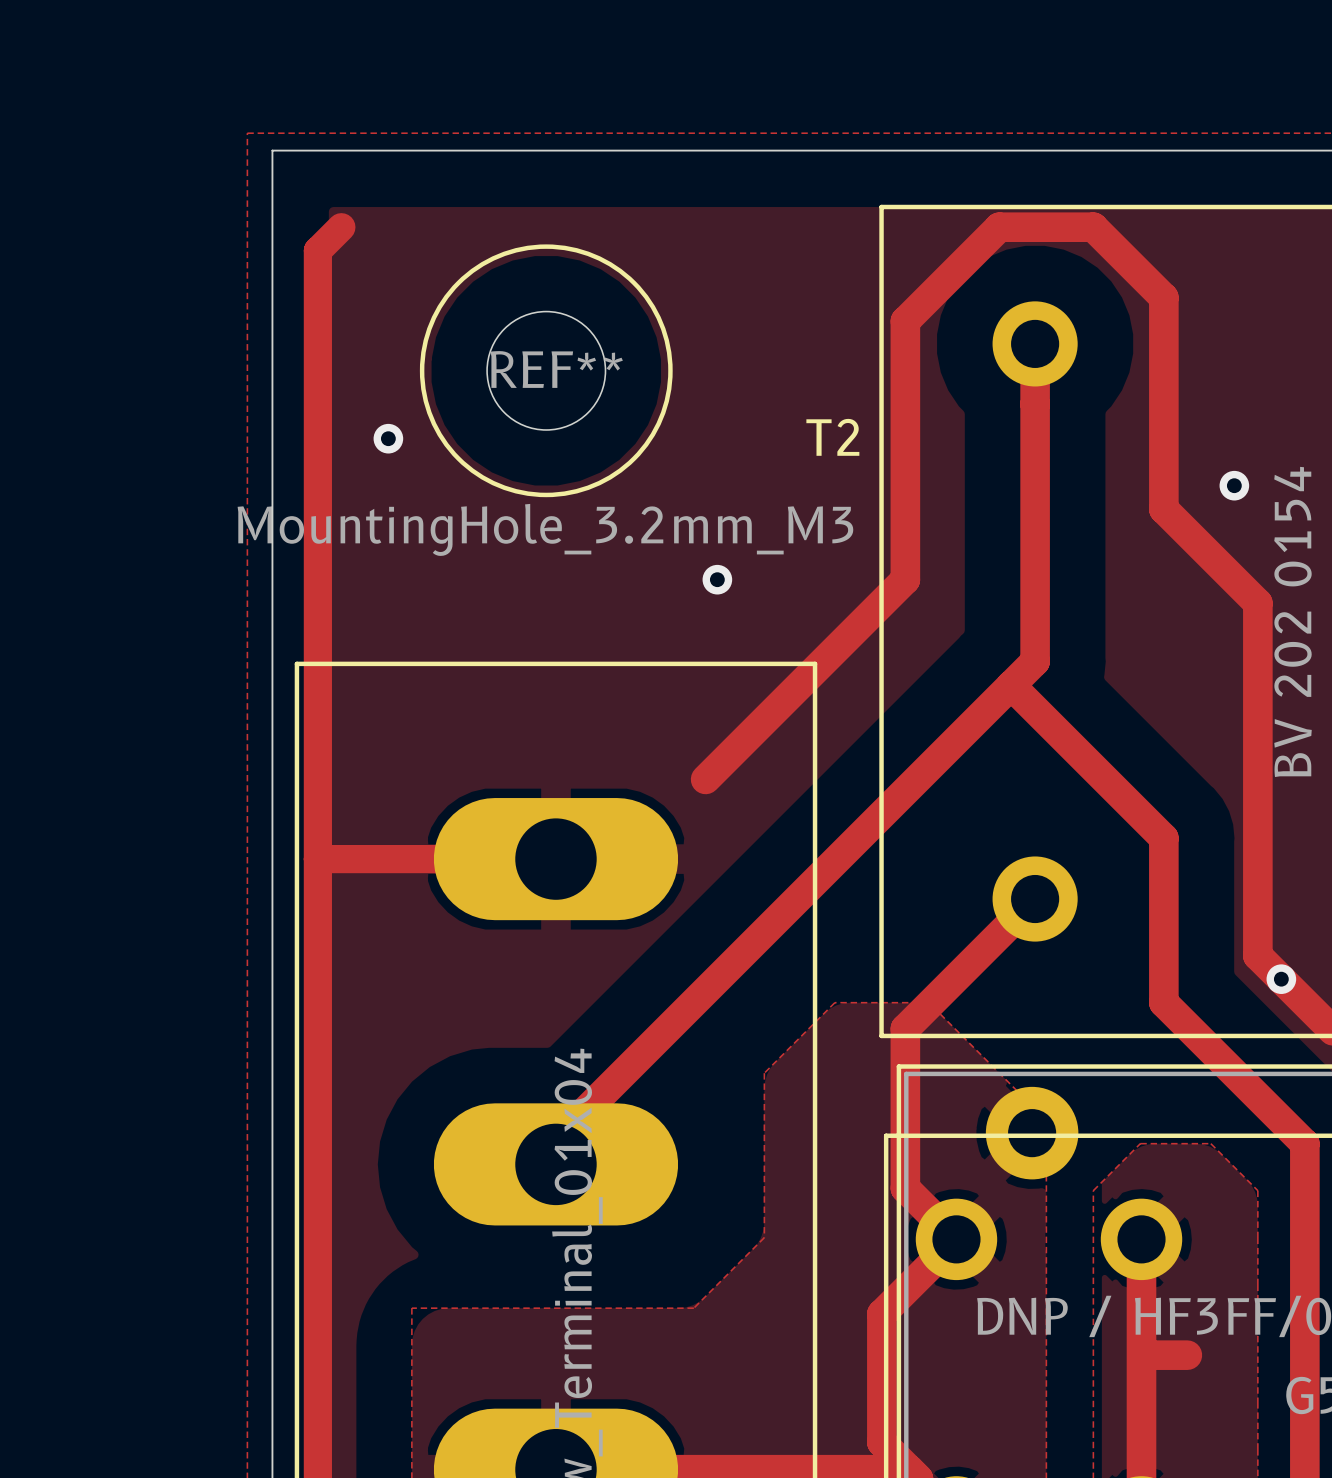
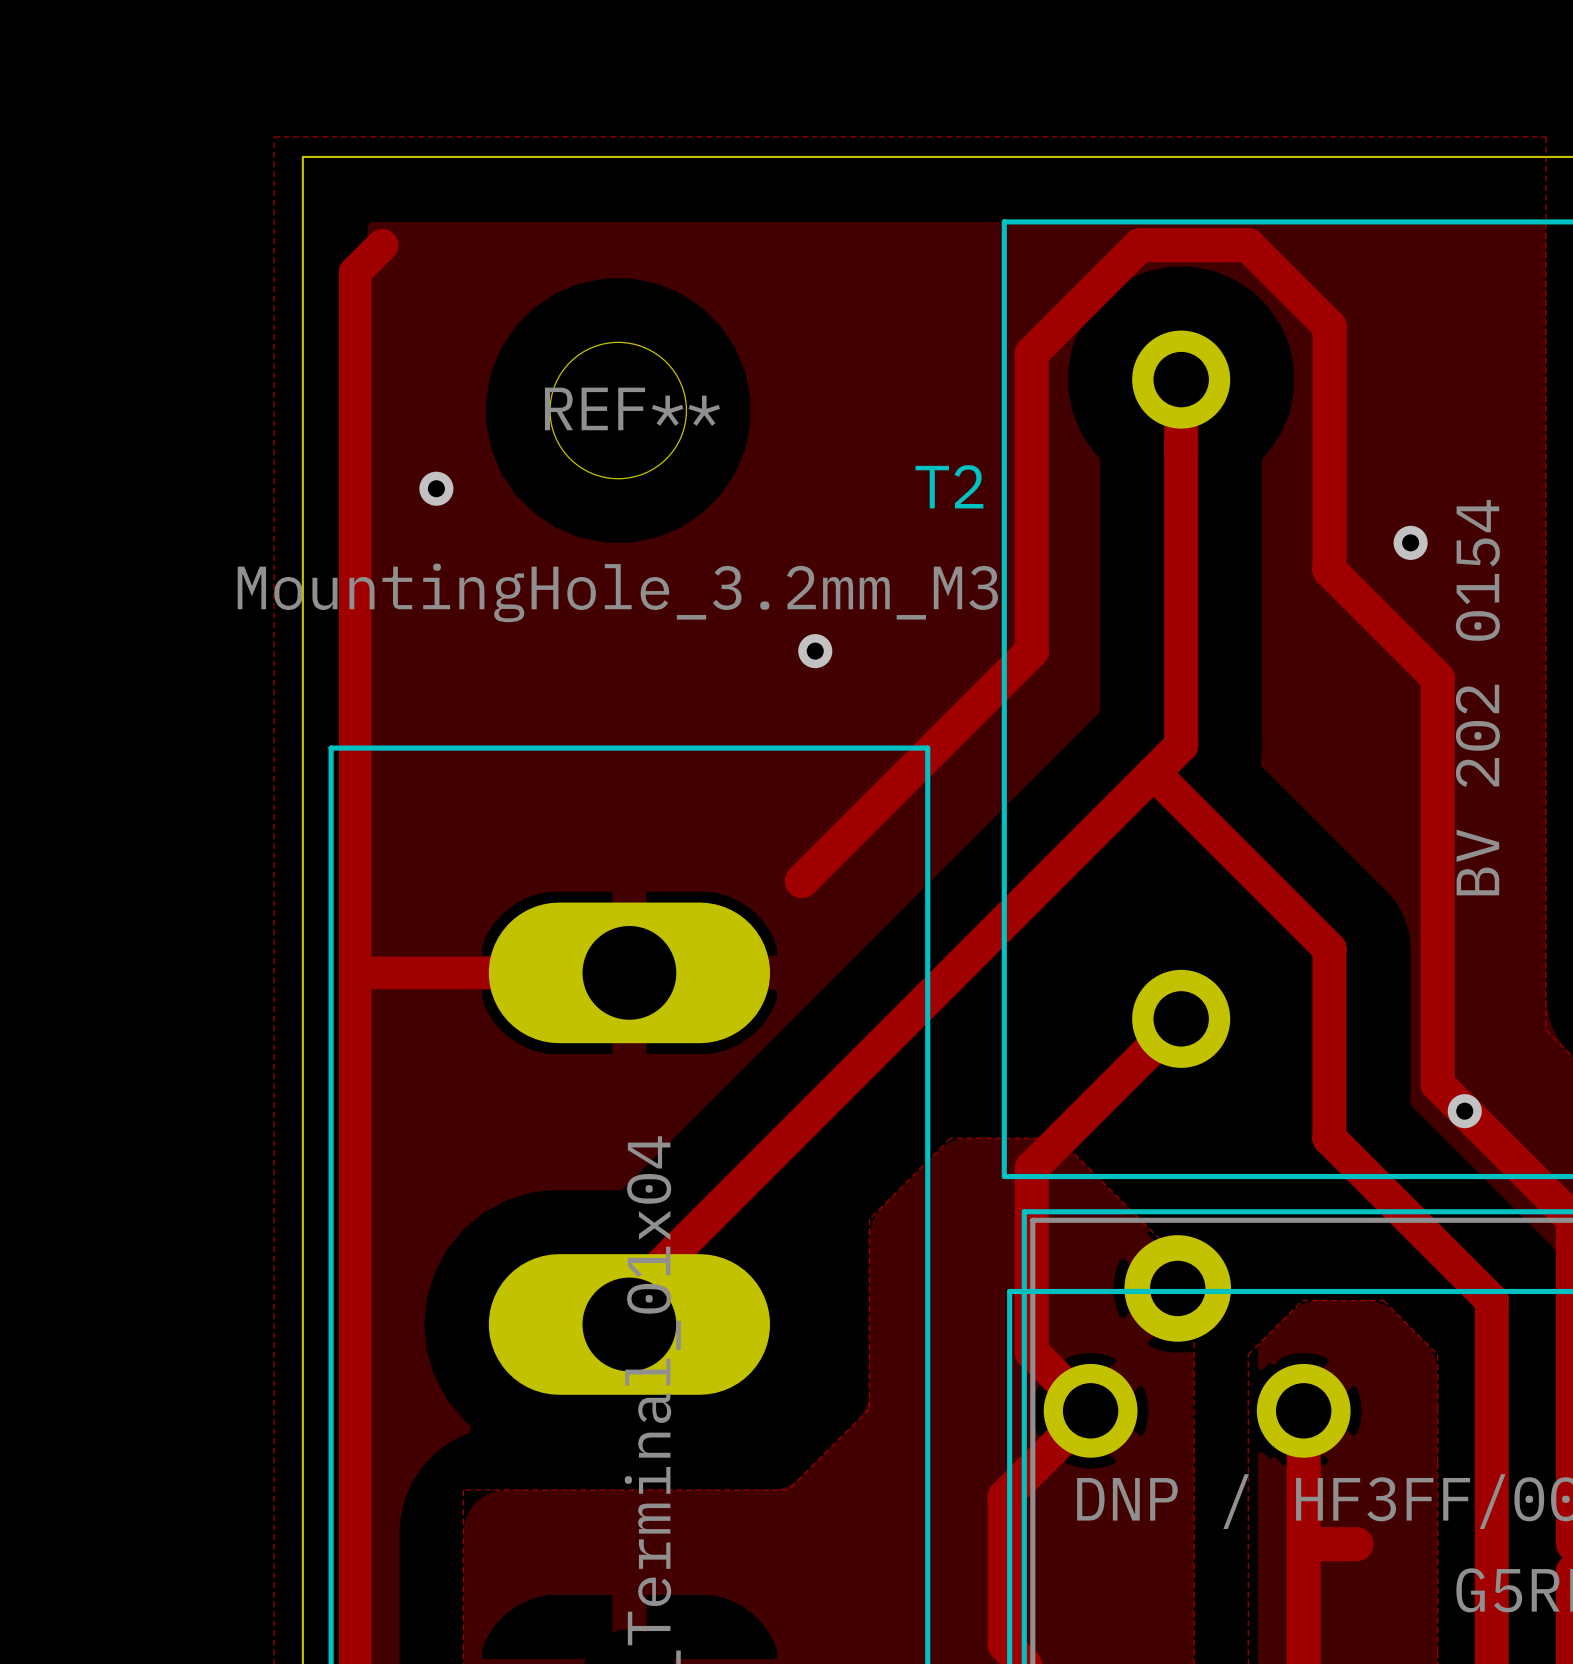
drawing: [419, 244, 673, 498] -> none

